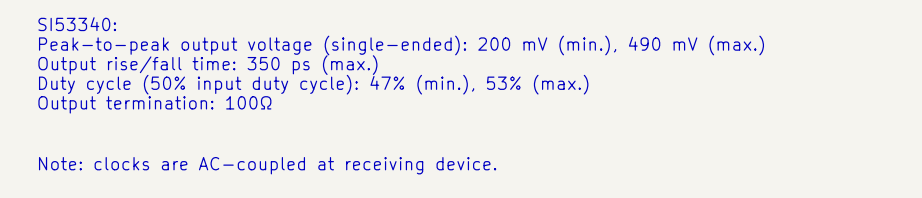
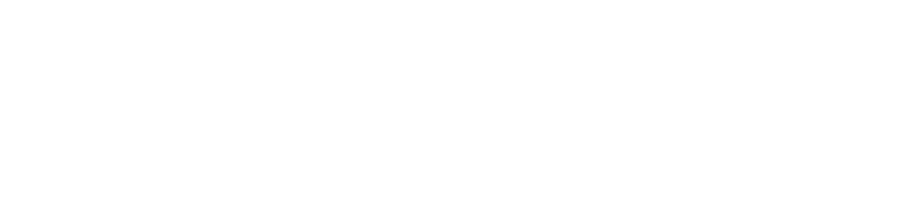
text: SI53340: (77, 24) -> none
text: Peak-to-peak output voltage (single-ended): 200 mV (min.), 490 mV (max.) (401, 45) -> none
text: Output rise/fall time: 350 ps (max.) (207, 65) -> none
text: Duty cycle (50% input duty cycle): 47% (min.), 53% (max.) (313, 84) -> none
text: Output termination: 100Ω (154, 104) -> none
text: Note: clocks are AC-coupled at receiving device. (267, 165) -> none

